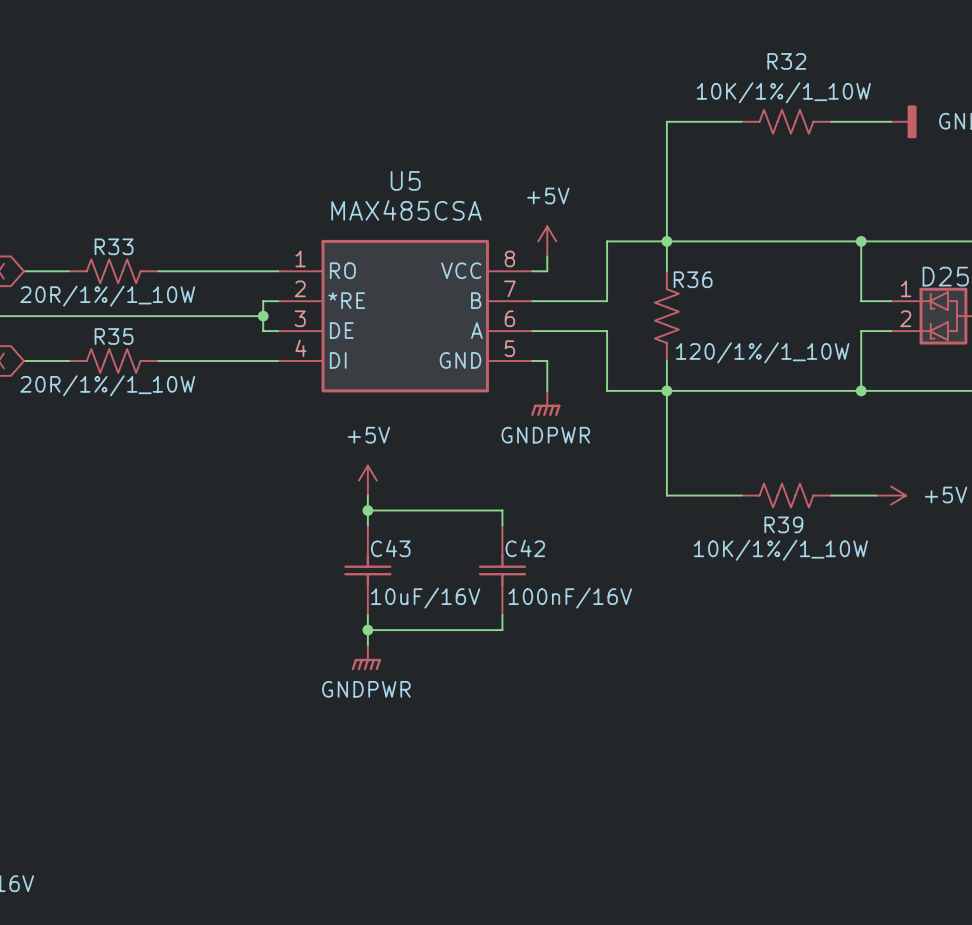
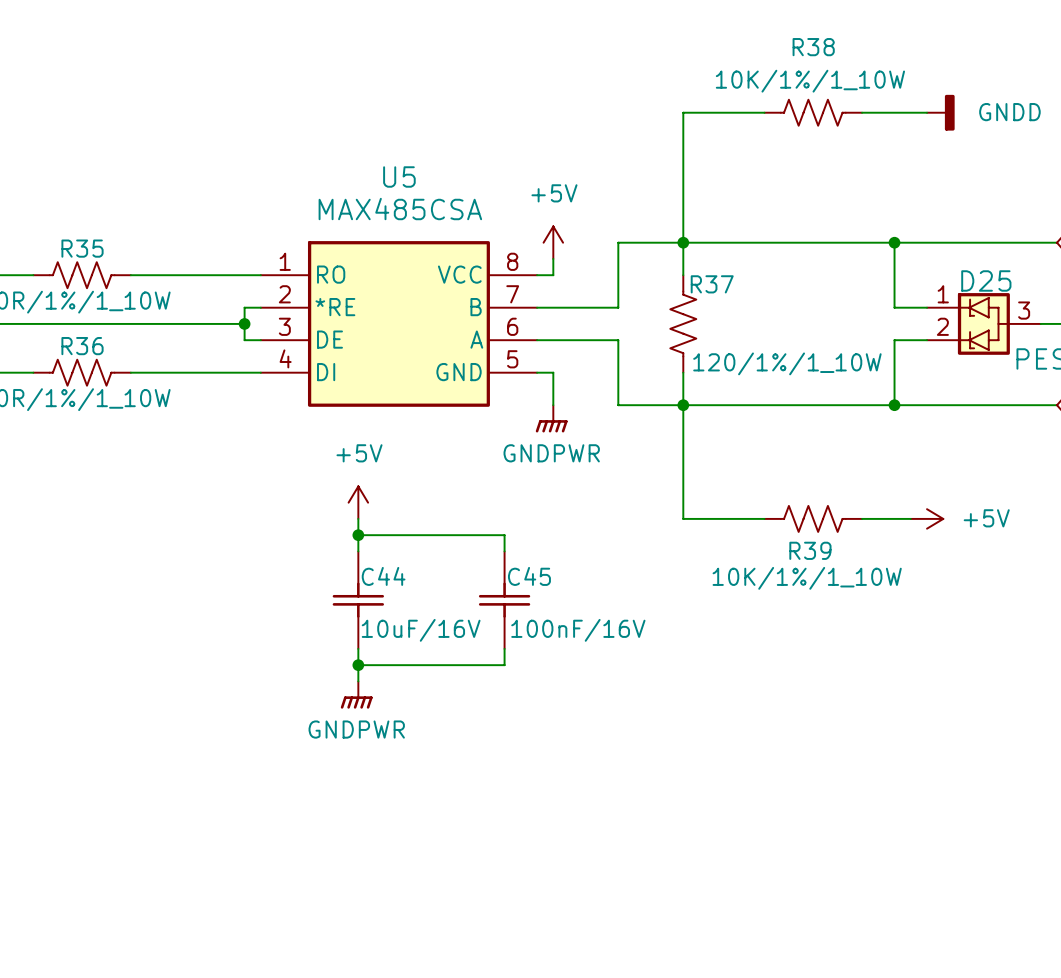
R32 name: R32 (786, 61) -> R38 (813, 47)
R33 name: R33 (114, 246) -> R35 (82, 248)
R36 name: R36 (693, 279) -> R37 (712, 284)
R35 name: R35 (114, 336) -> R36 (82, 346)
C43 name: C43 (390, 548) -> C44 (383, 576)
C42 name: C42 (525, 548) -> C45 (529, 576)

